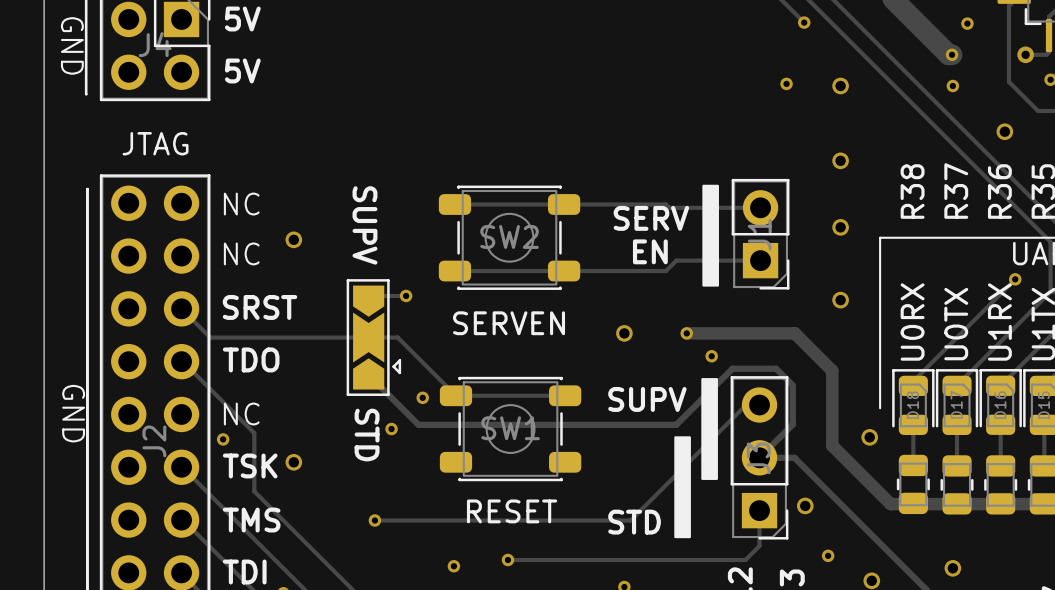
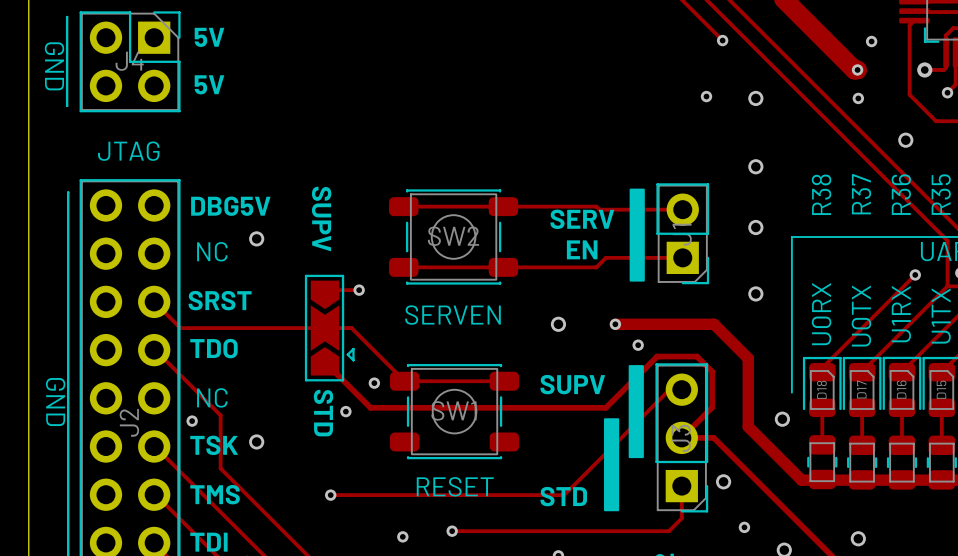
text: NC (241, 204) -> none
text: none -> DBG5V (230, 206)

